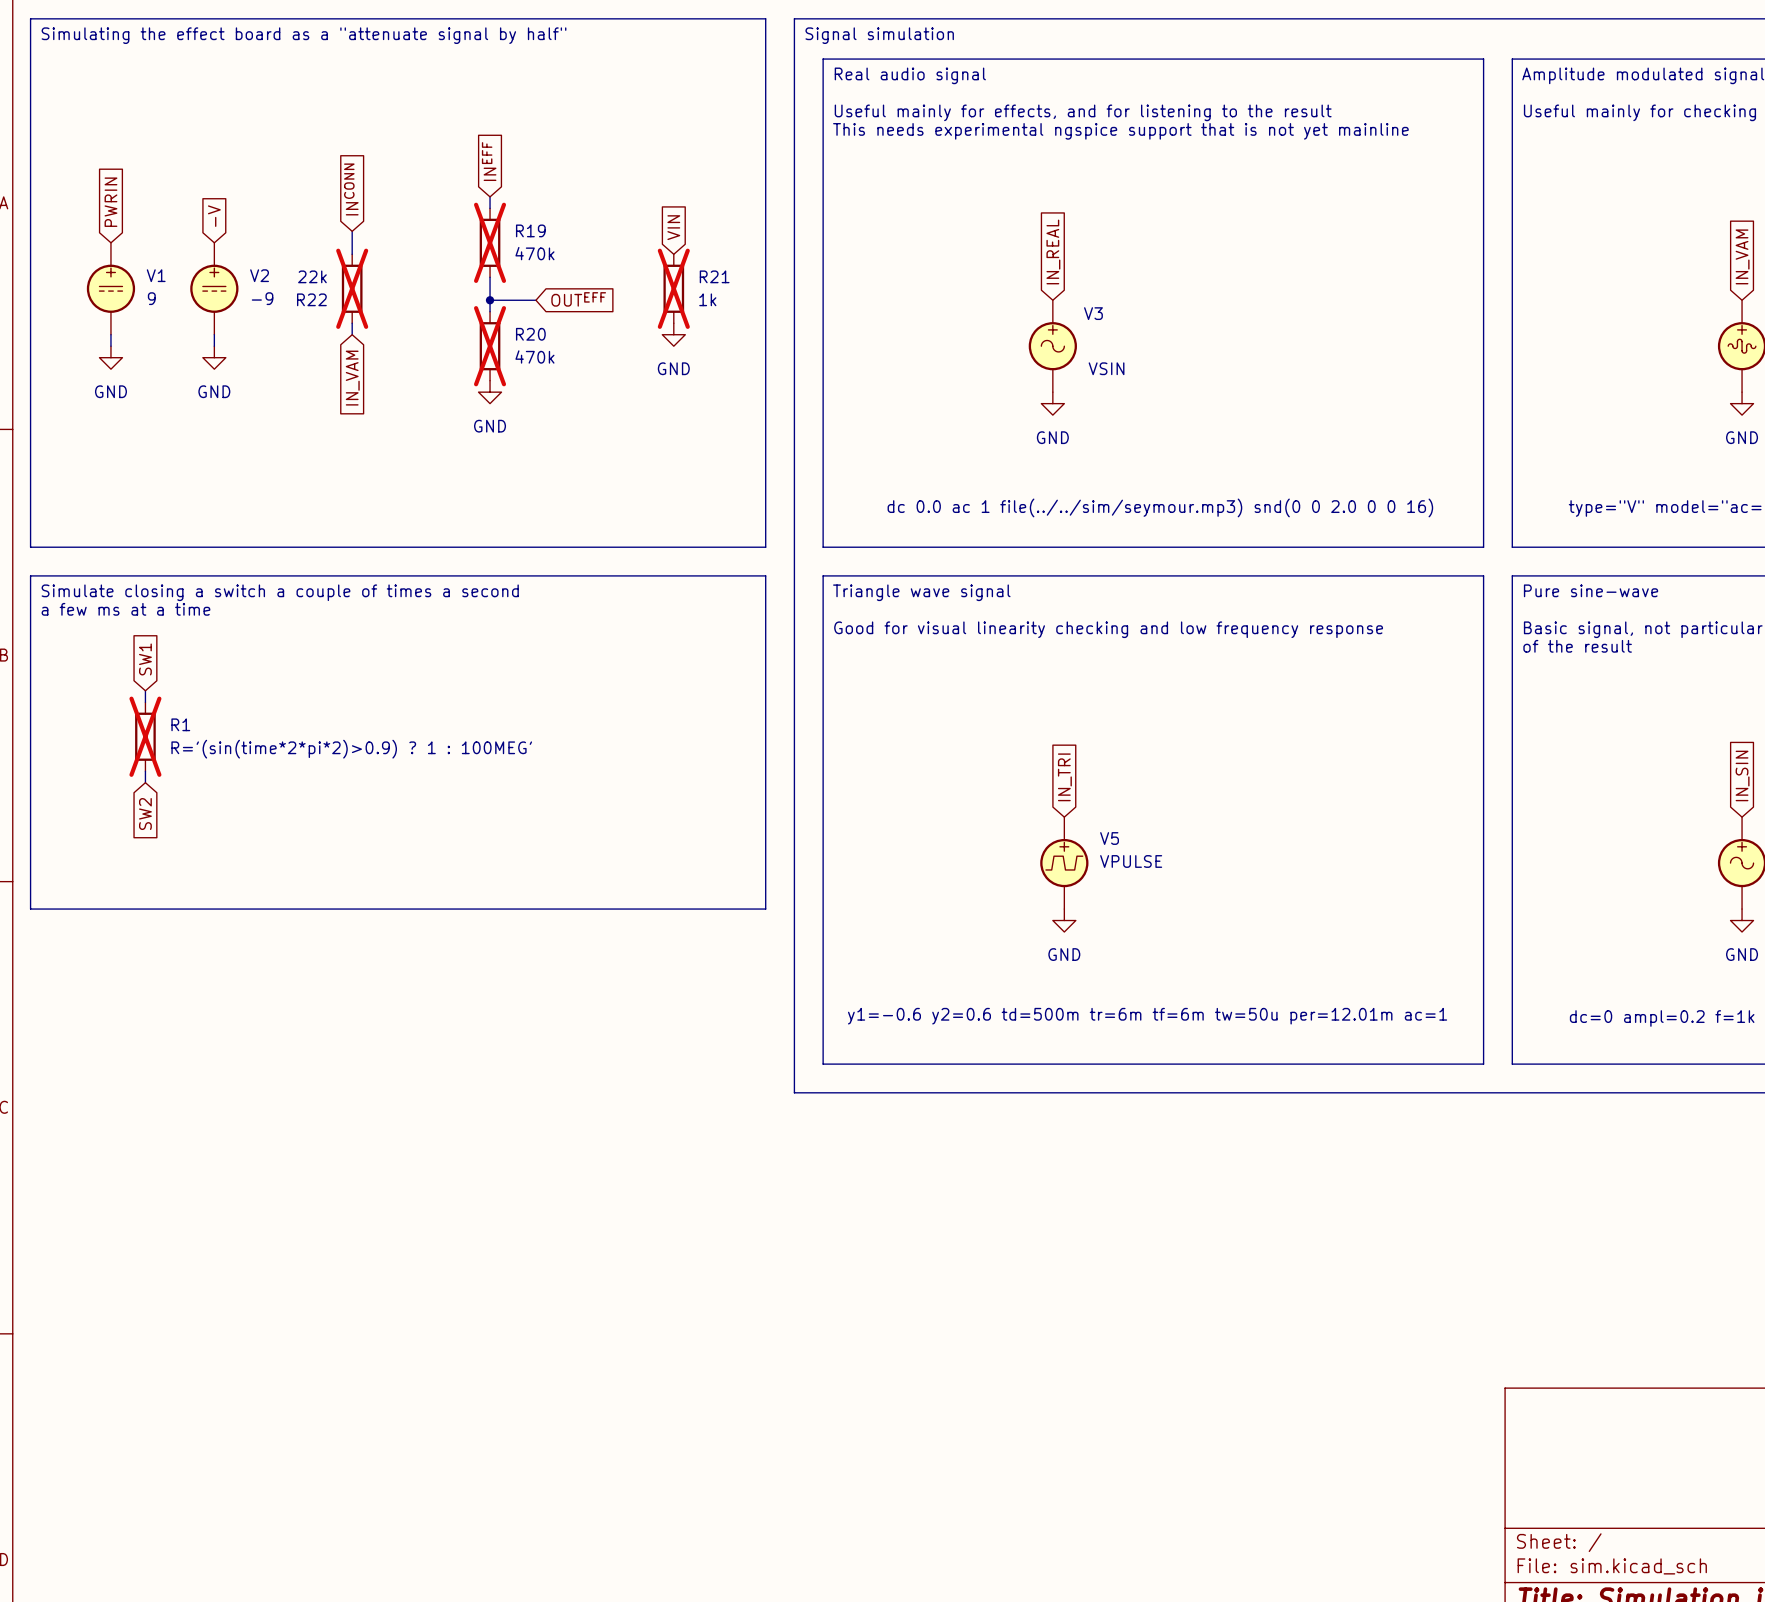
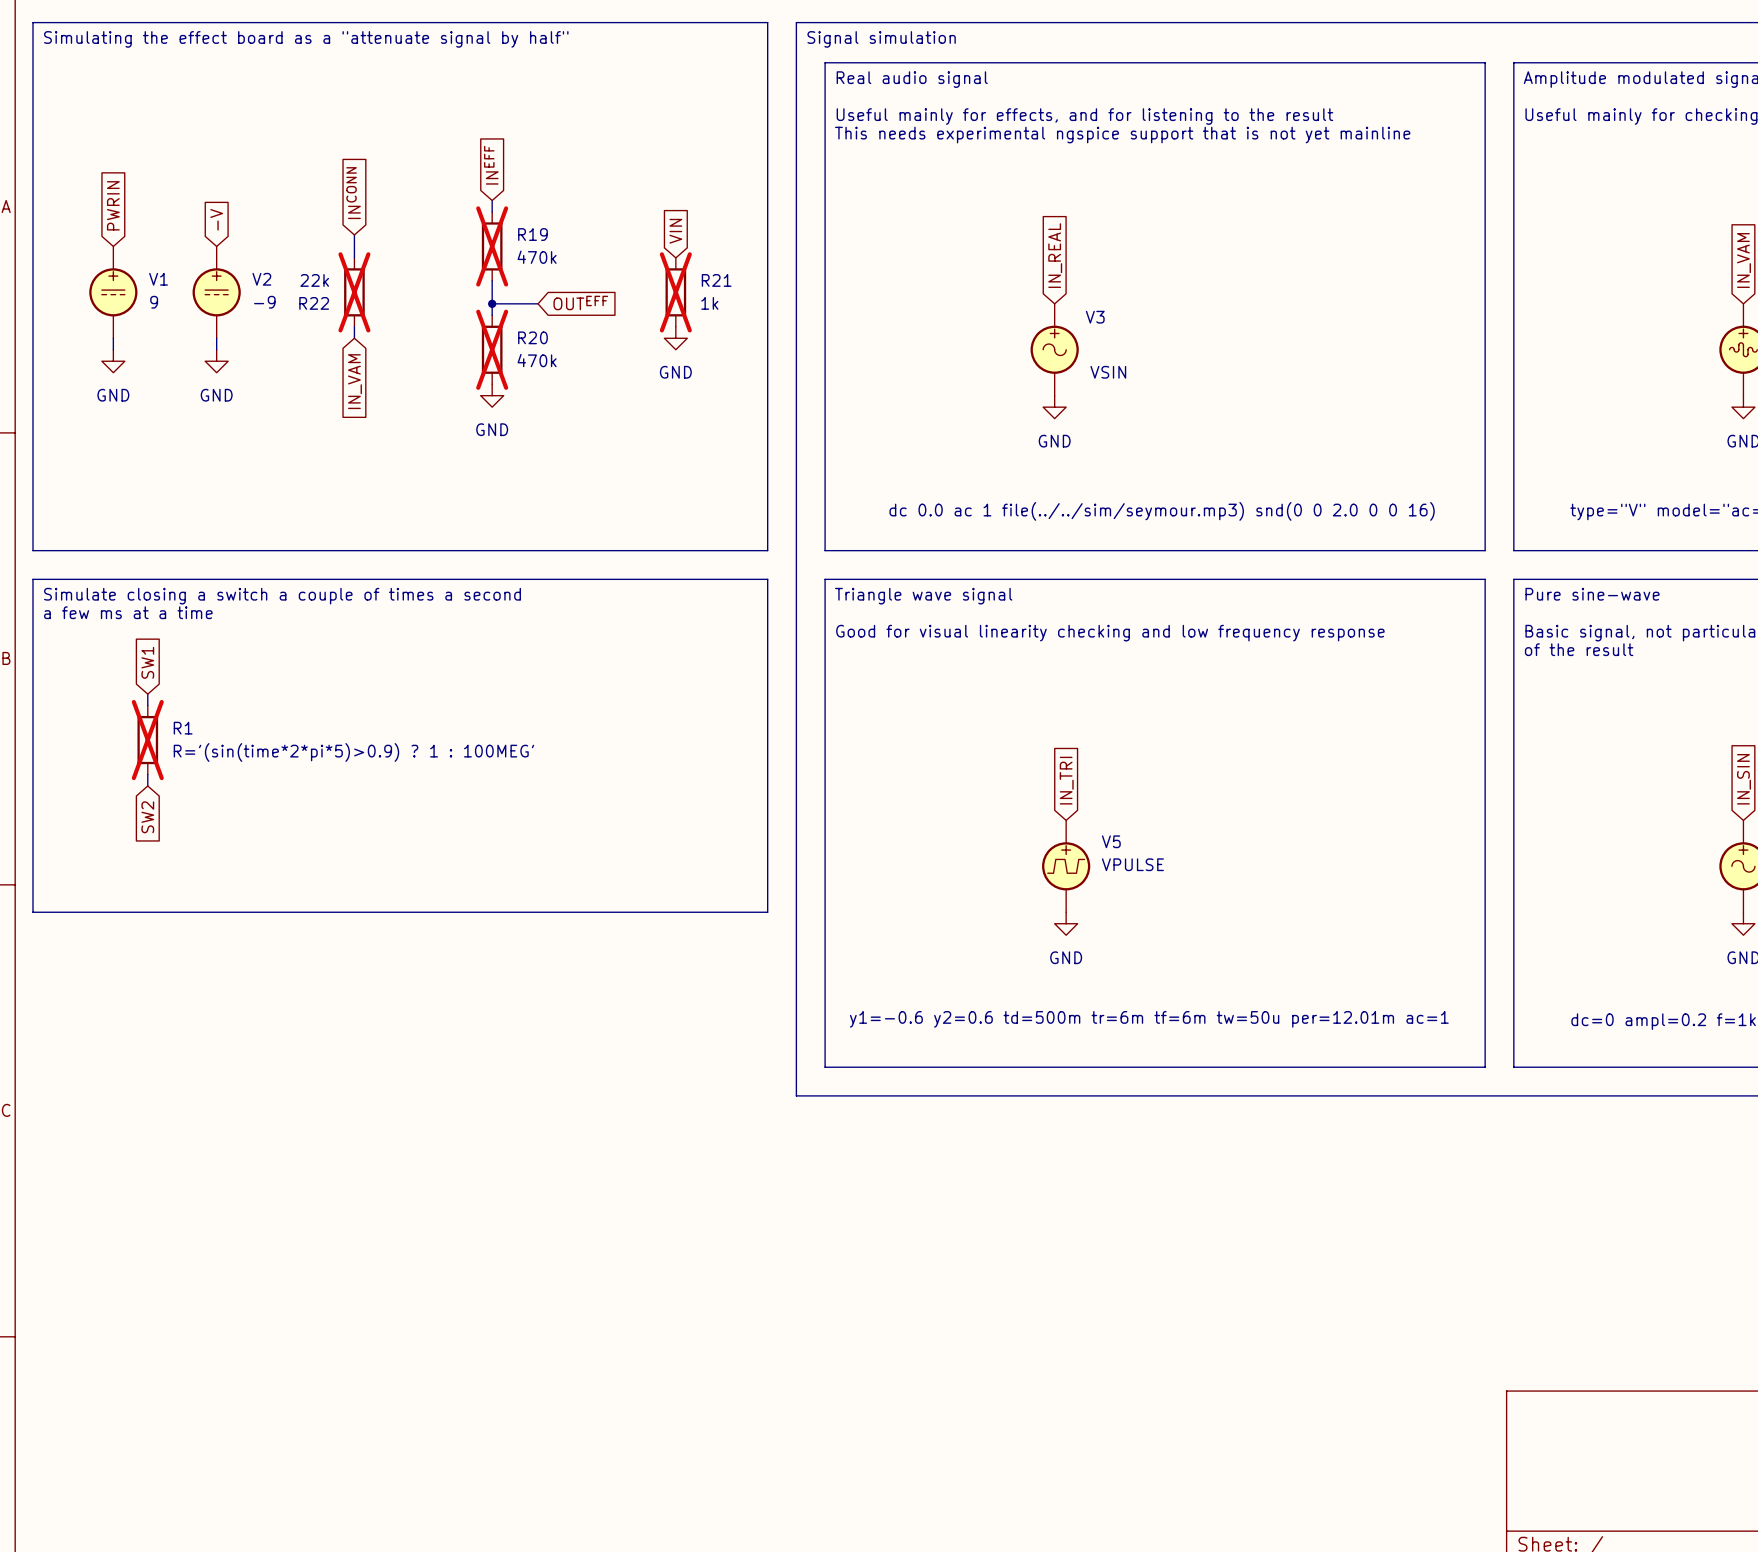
R1 value: R='(sin(time*2*pi*2)>0.9) ? 1 : 100MEG' (351, 749) -> R='(sin(time*2*pi*5)>0.9) ? 1 : 100MEG' (353, 752)

